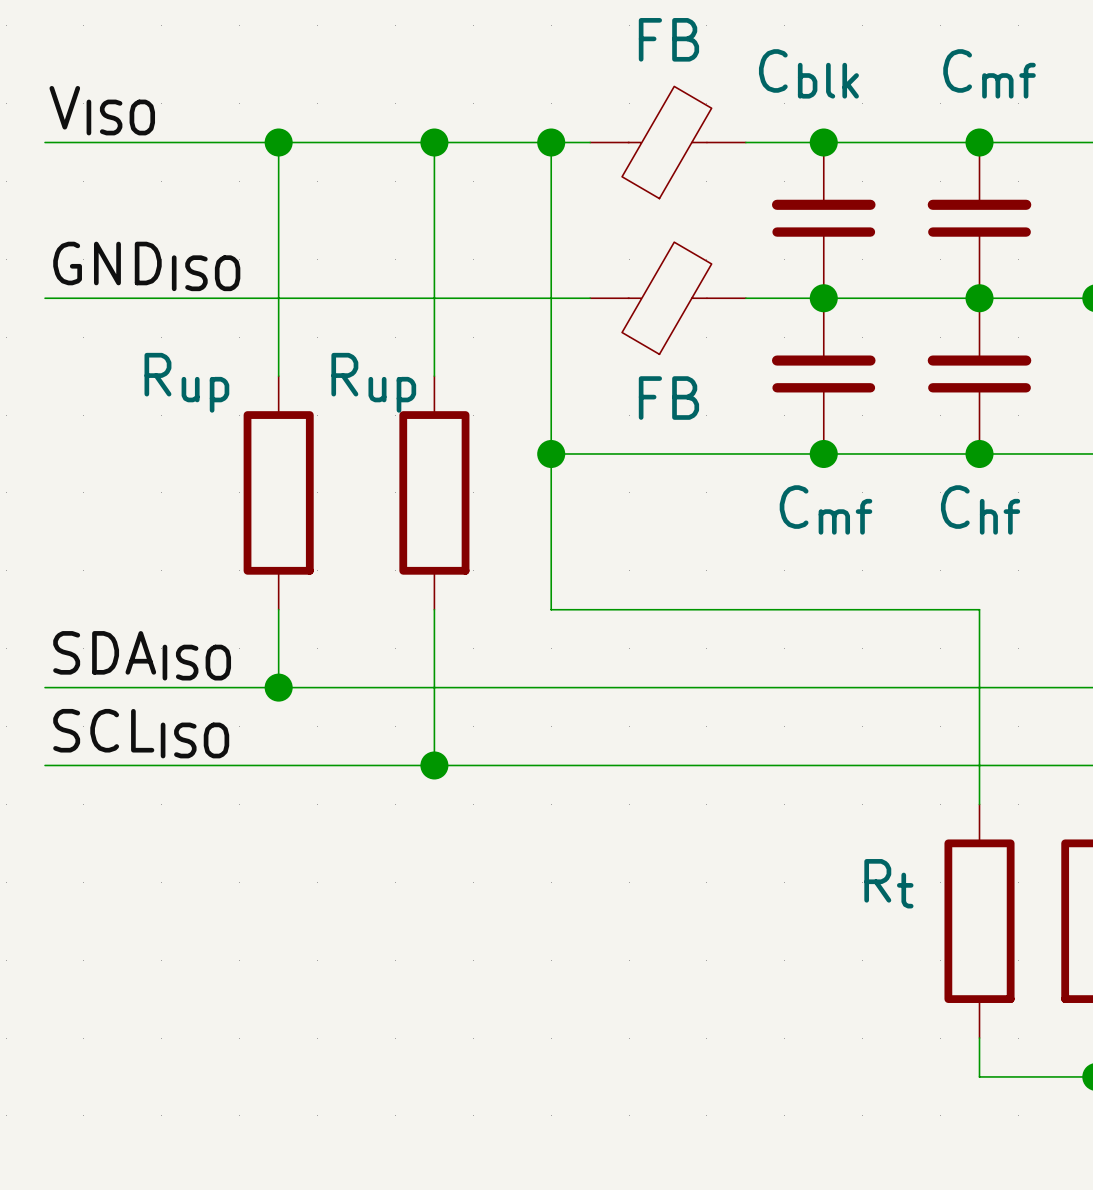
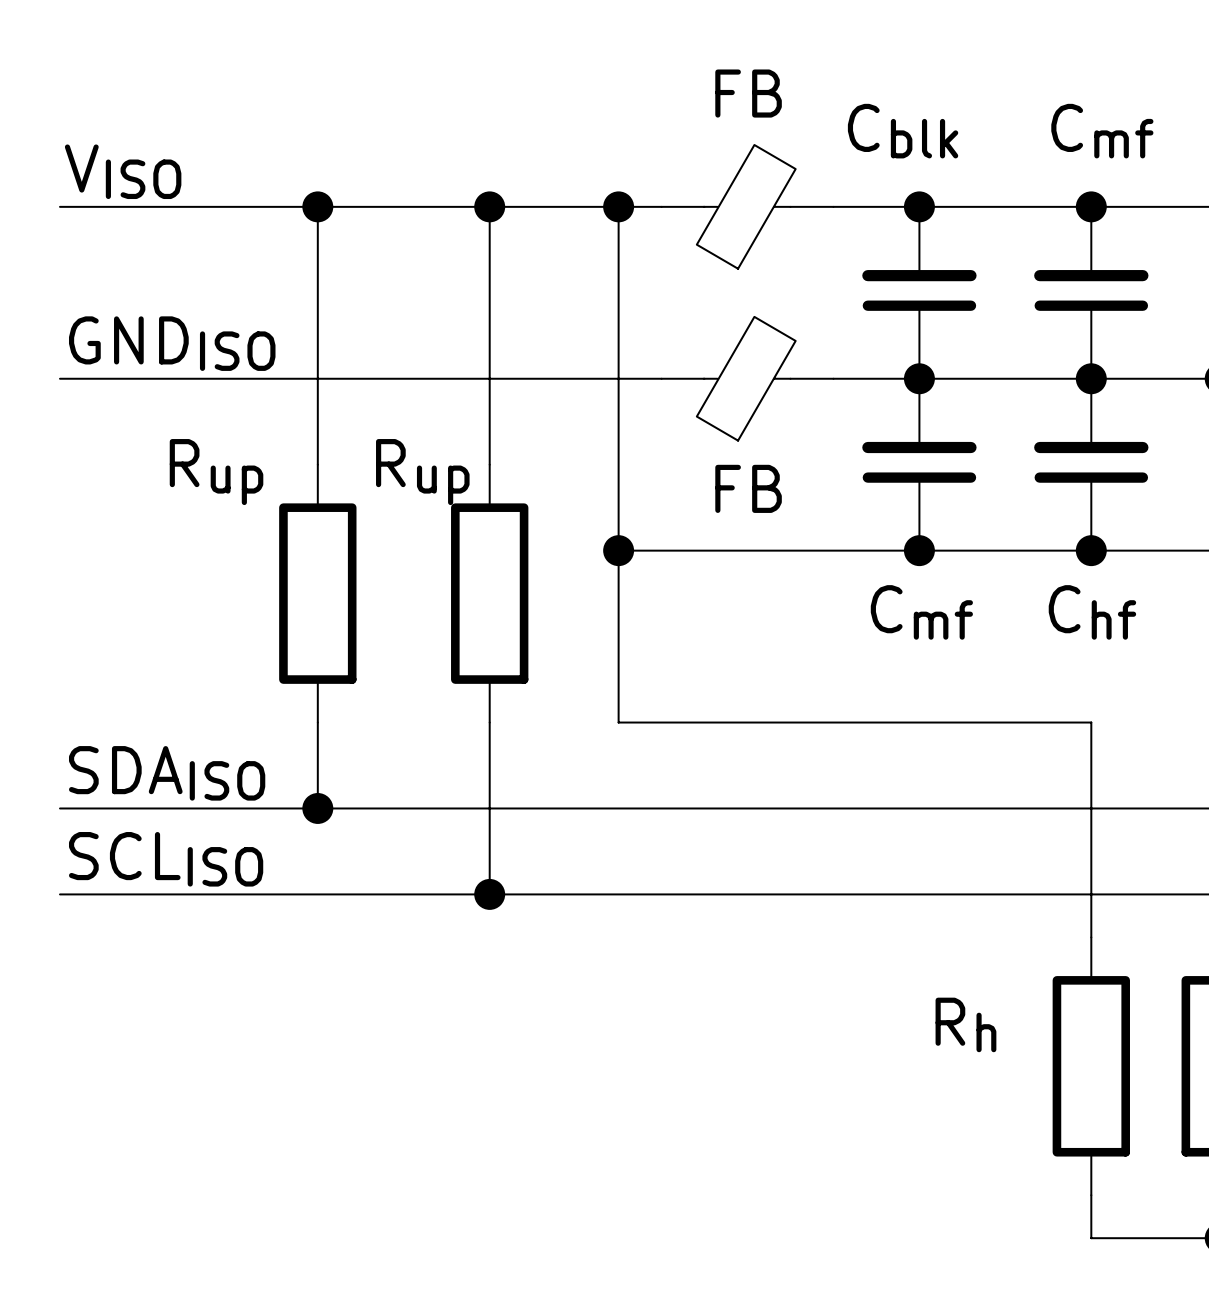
Rt name: Rt (888, 883) -> Rh (965, 1024)

